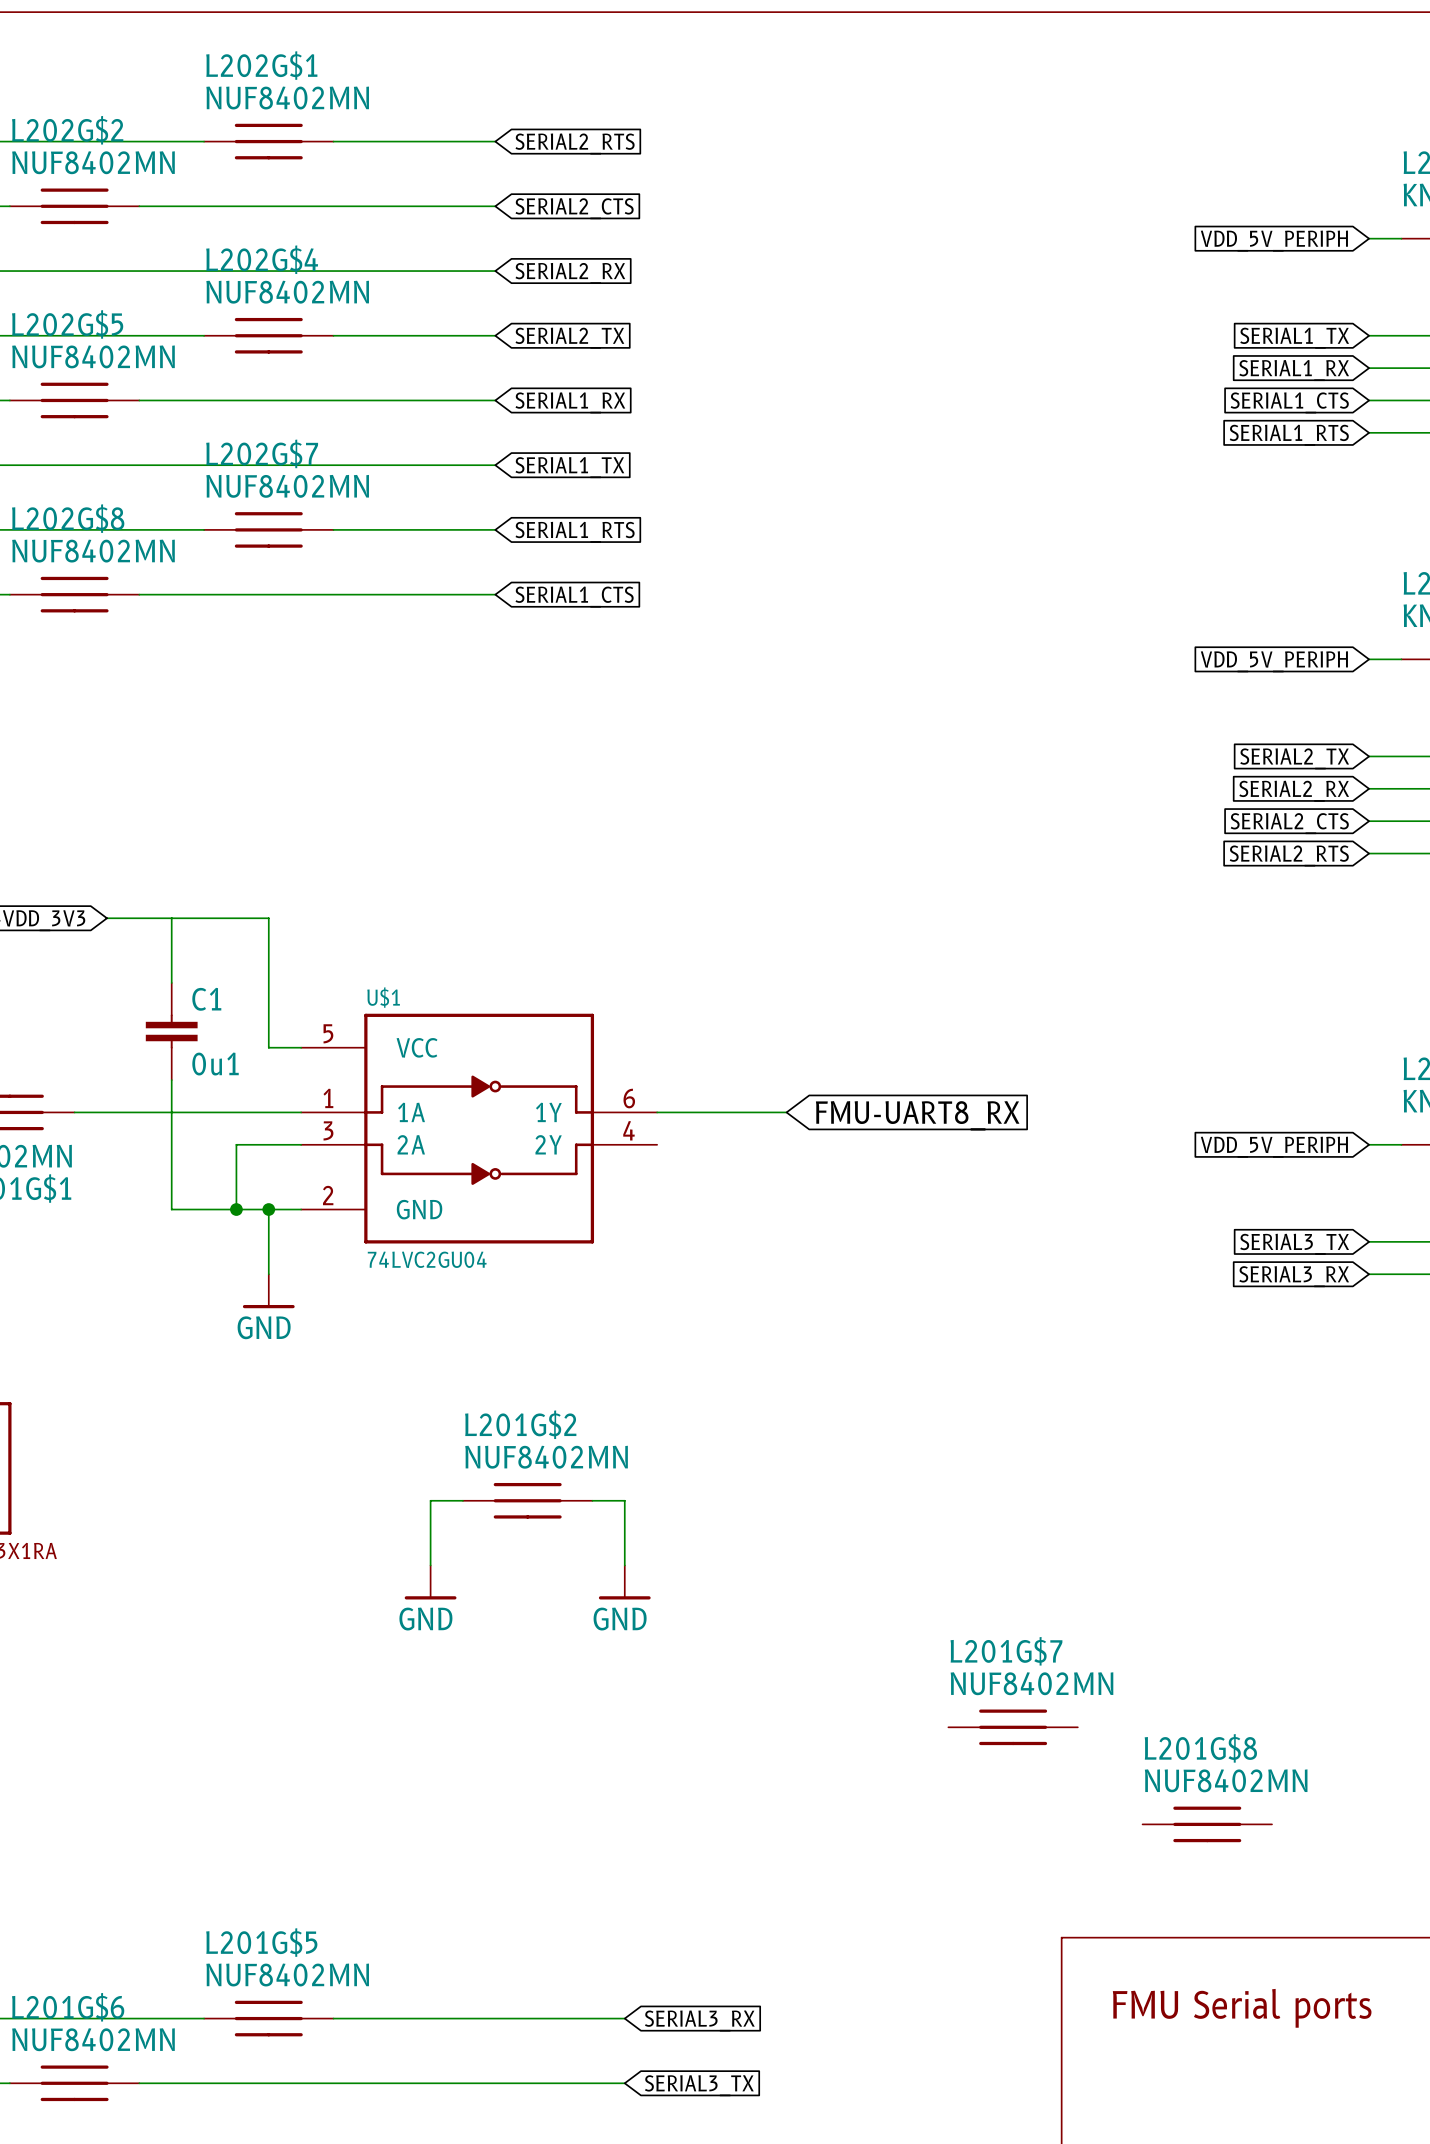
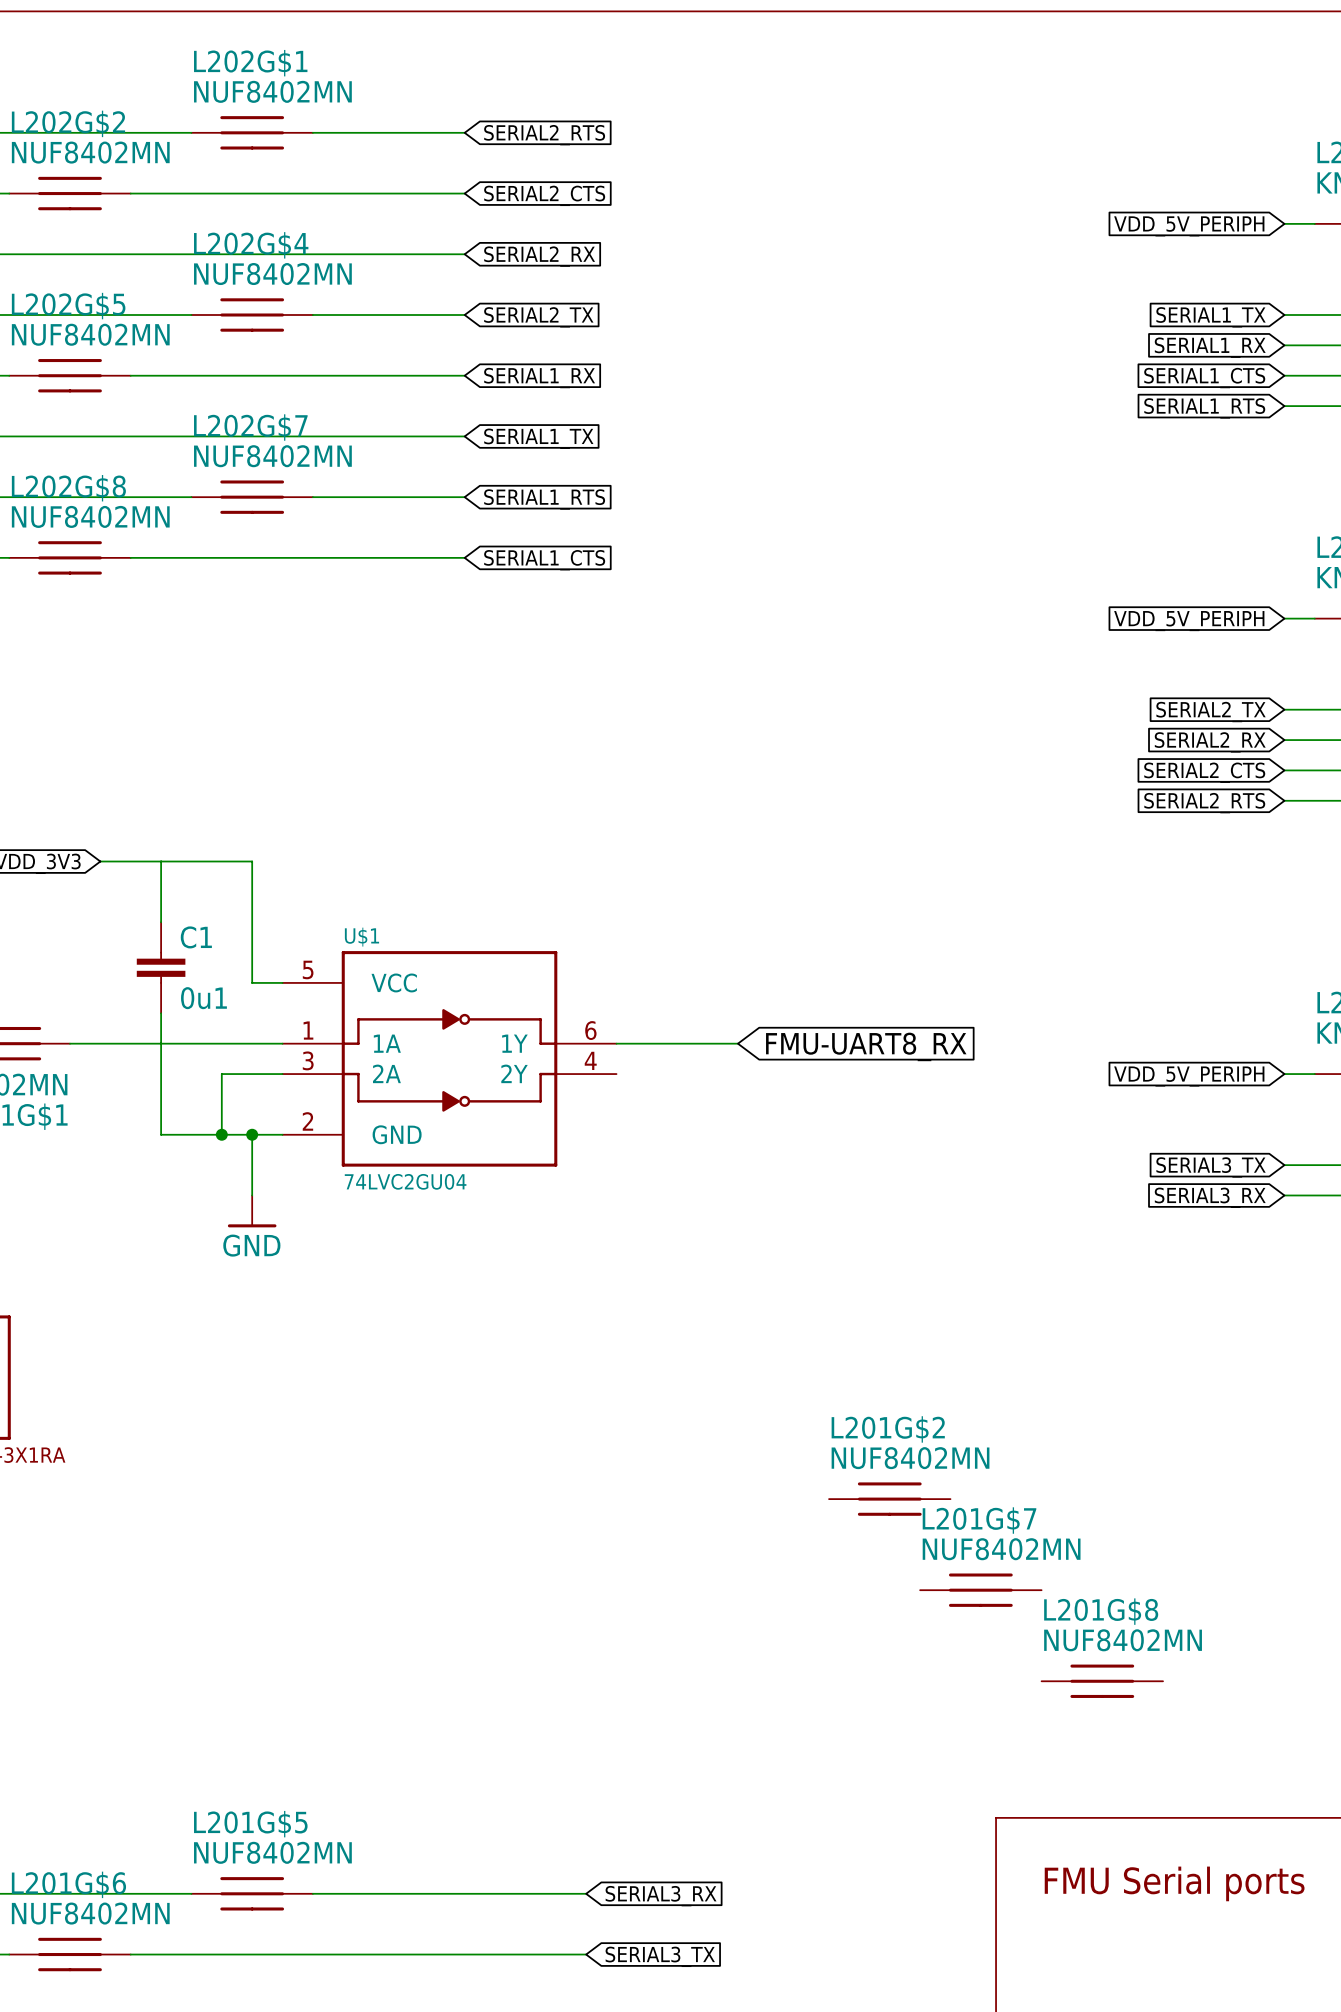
wire: (462, 1500) (430, 1500) (430, 1565) -> none
L201G$2 position: (527, 1500) -> (889, 1499)
wire: (592, 1500) (624, 1500) (624, 1565) -> none
power symbol: GND (430, 1582) -> none
power symbol: GND (624, 1582) -> none
L201G$7 position: (1013, 1727) -> (980, 1590)
L201G$8 position: (1207, 1824) -> (1102, 1681)

